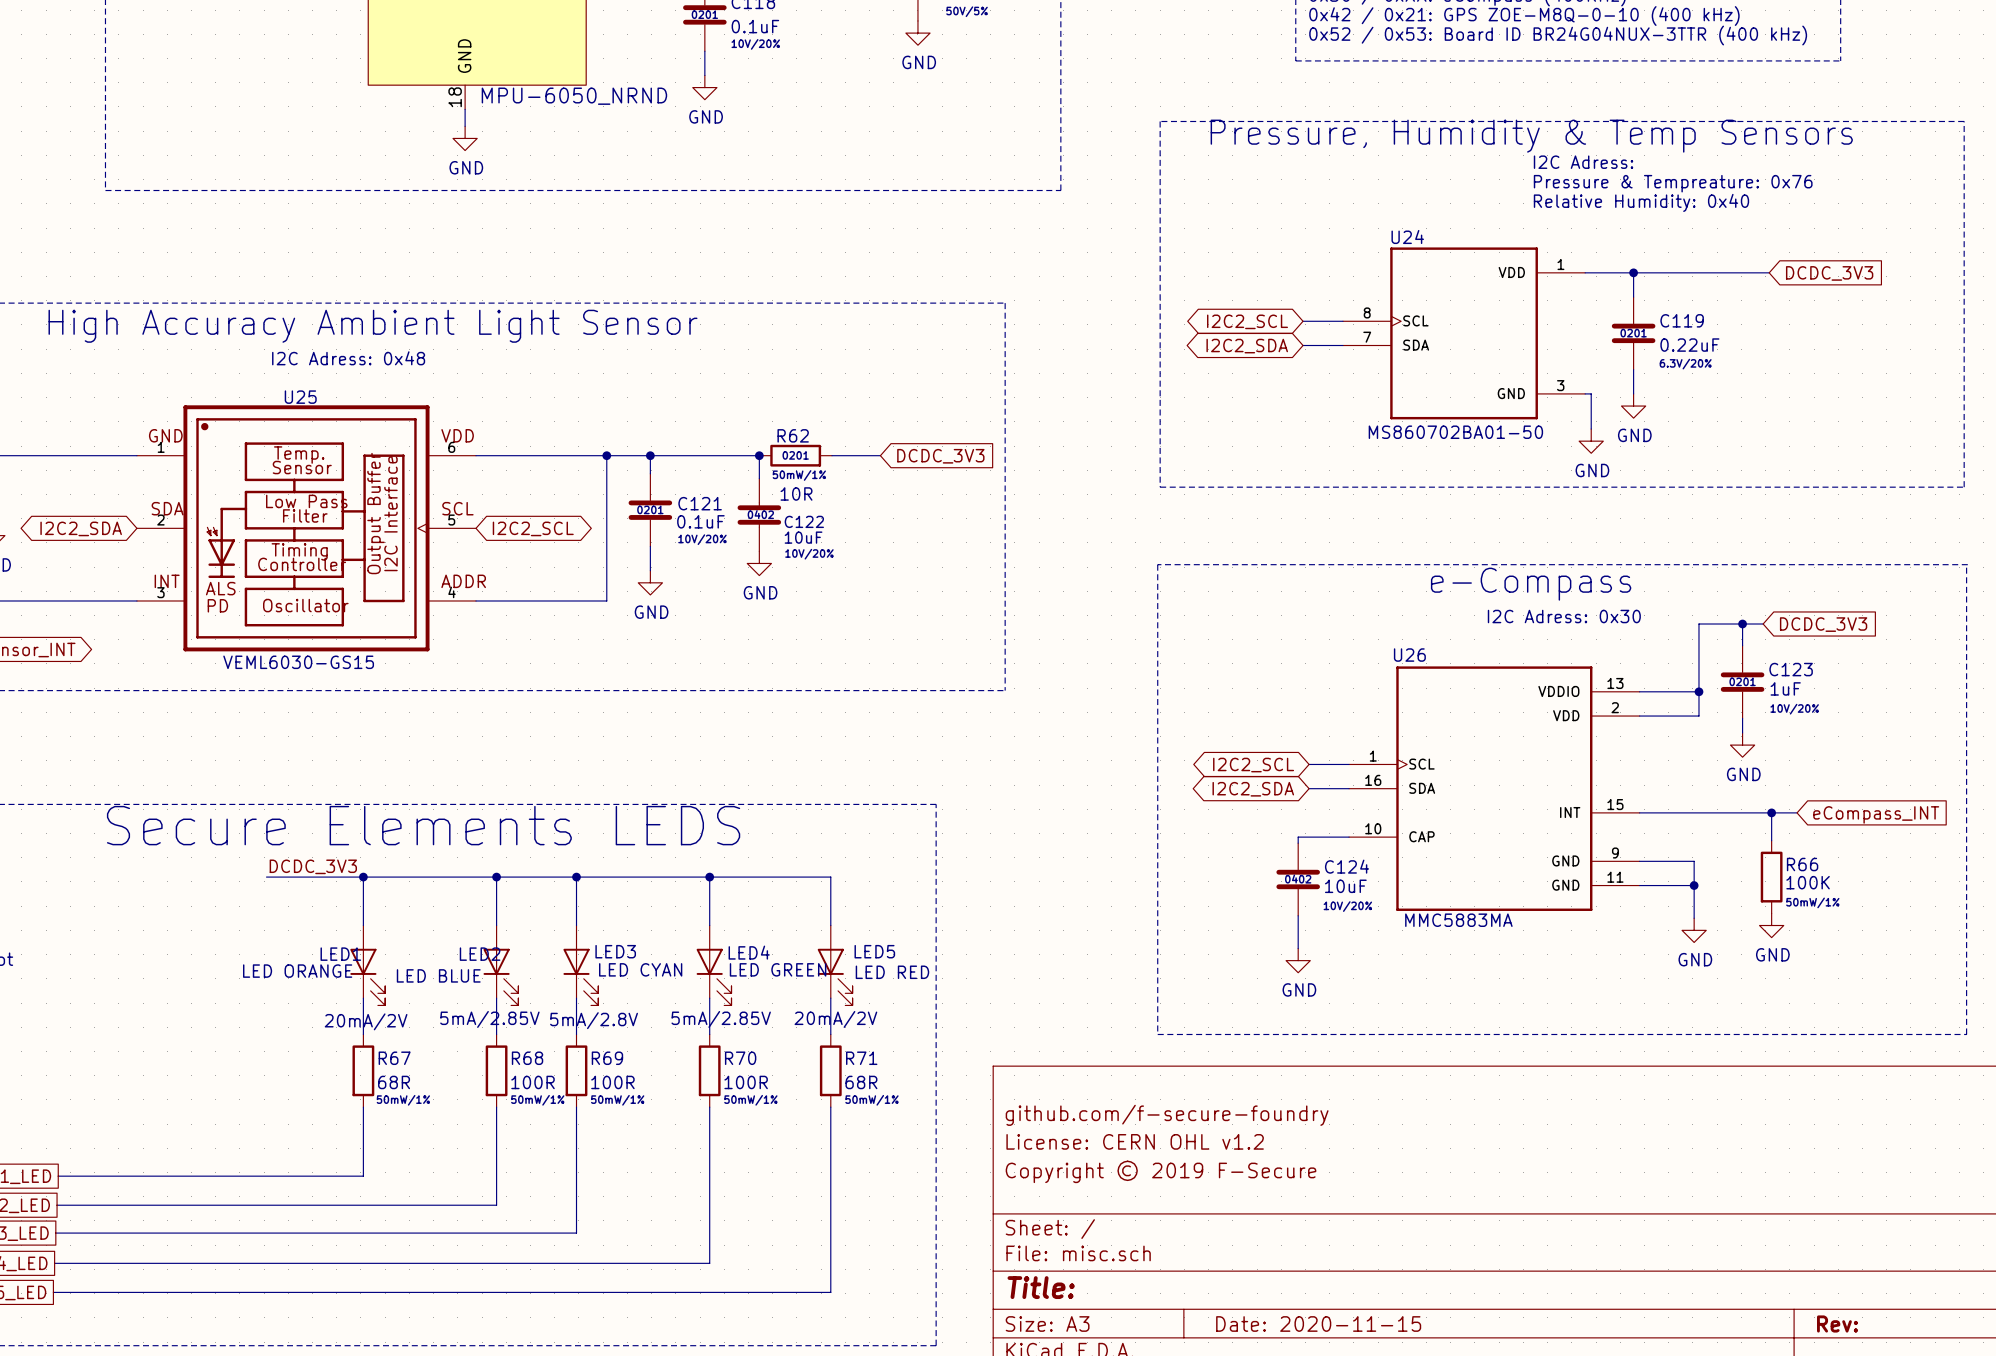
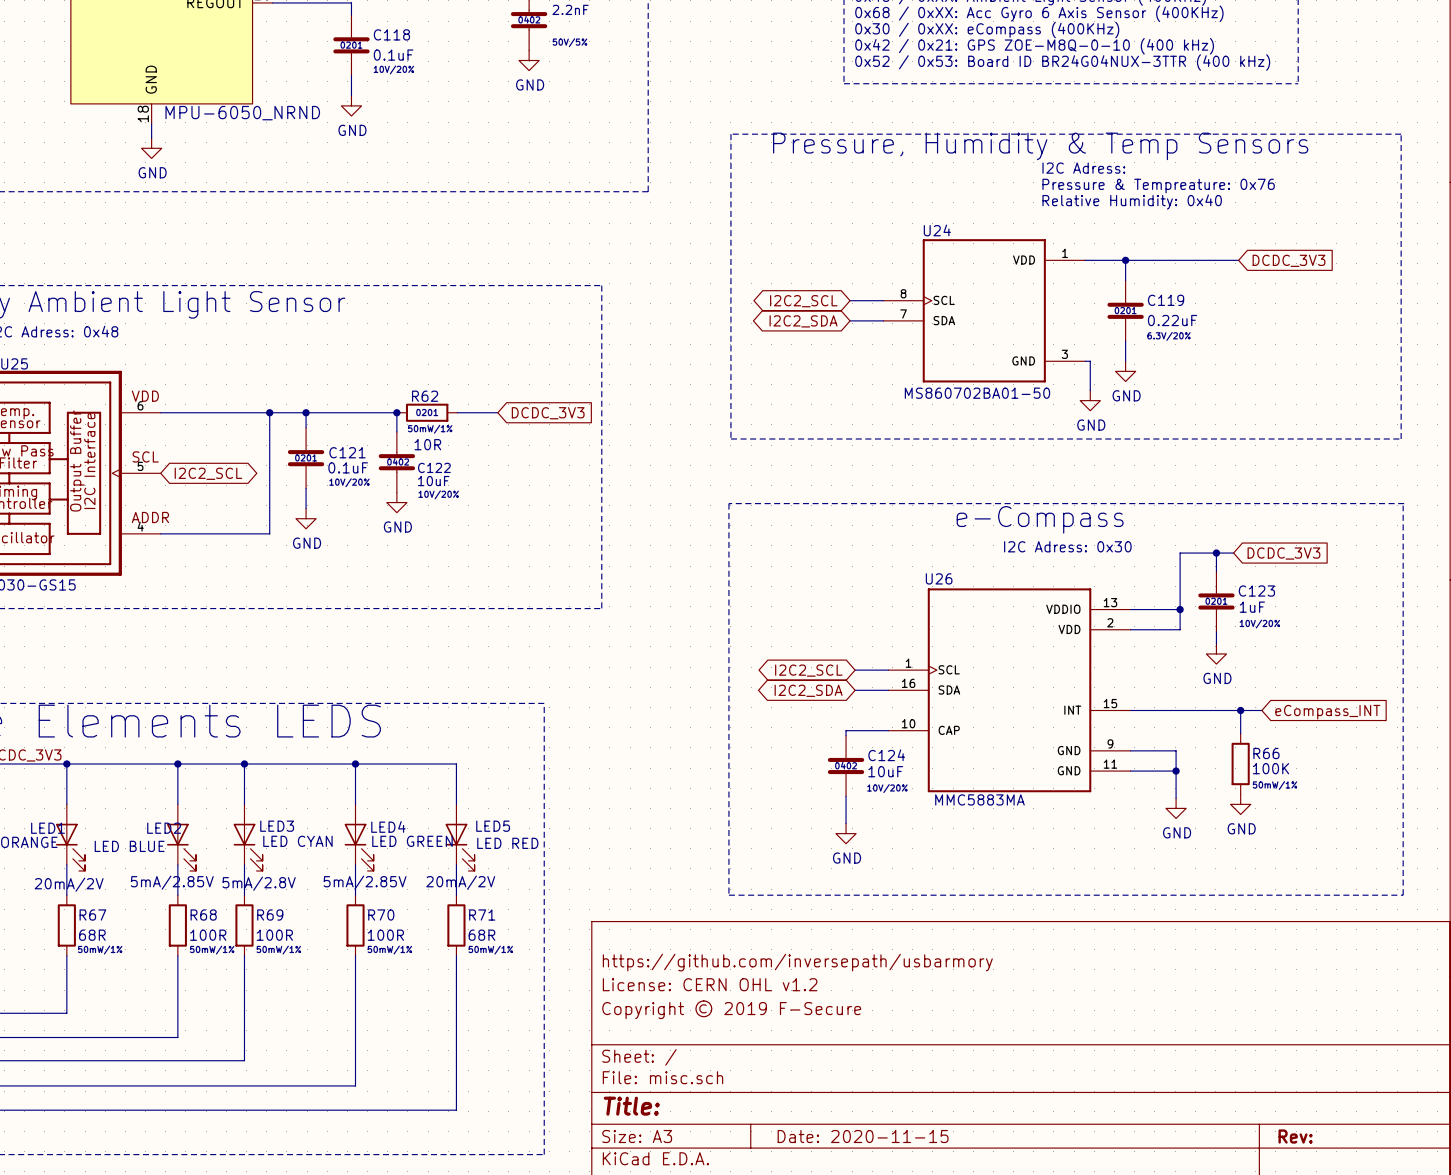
title block: github.com/f-secure-foundry (1167, 1115) -> https://github.com/inversepath/usbarmory (797, 962)

